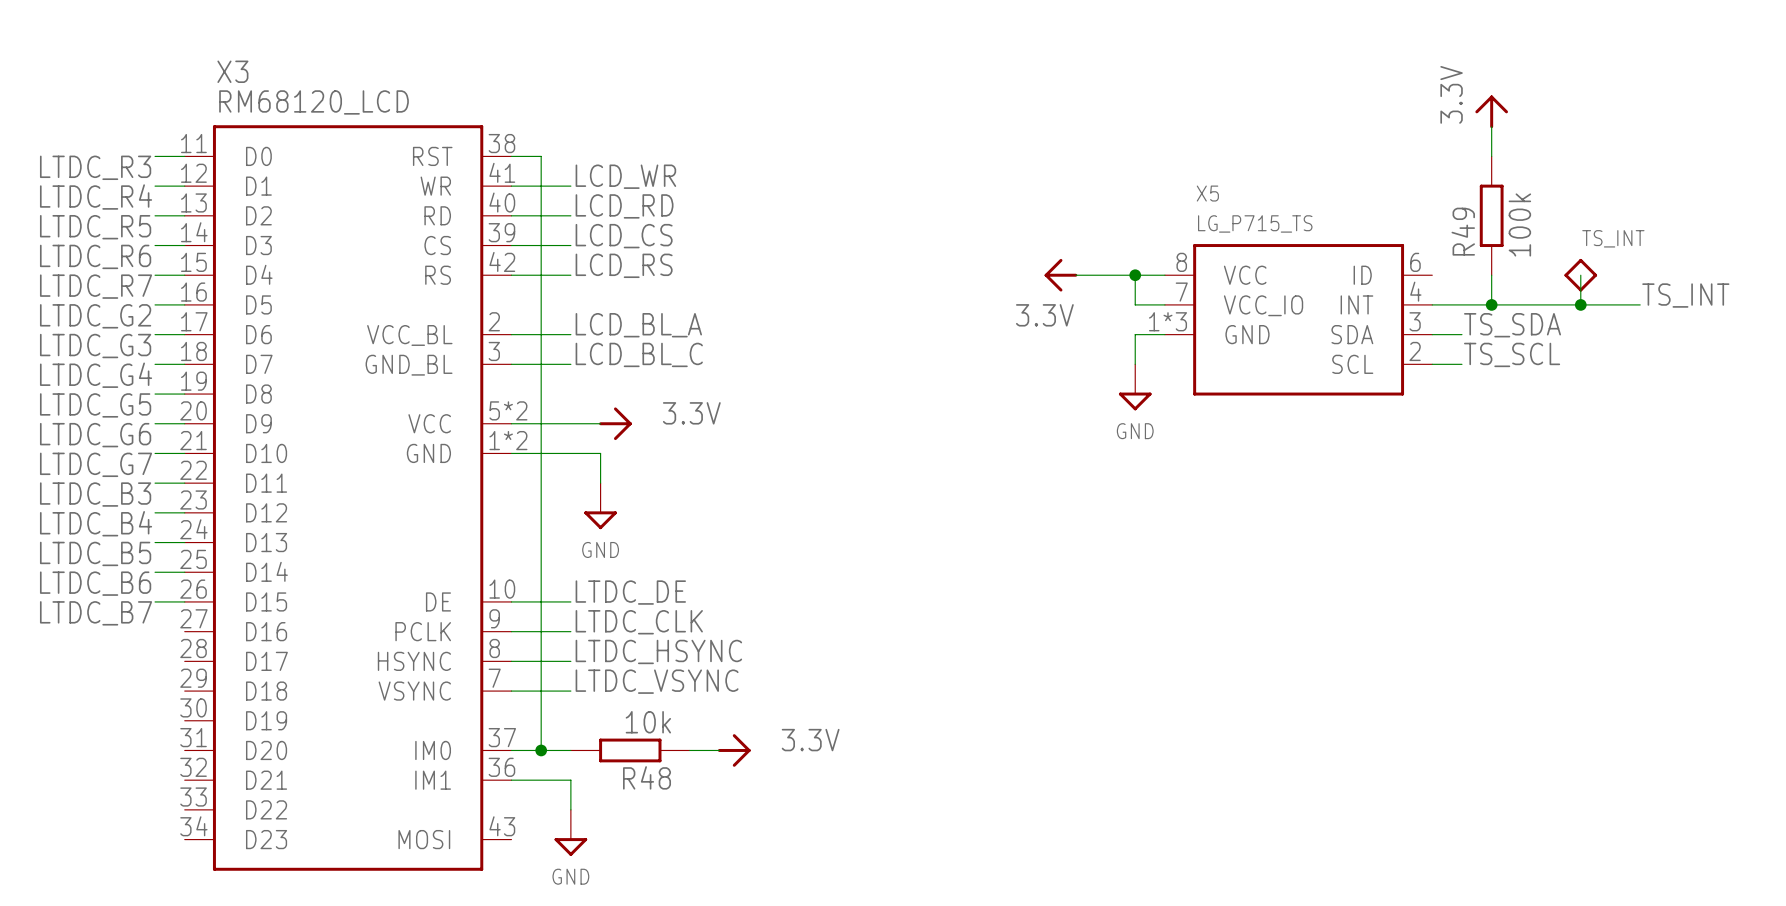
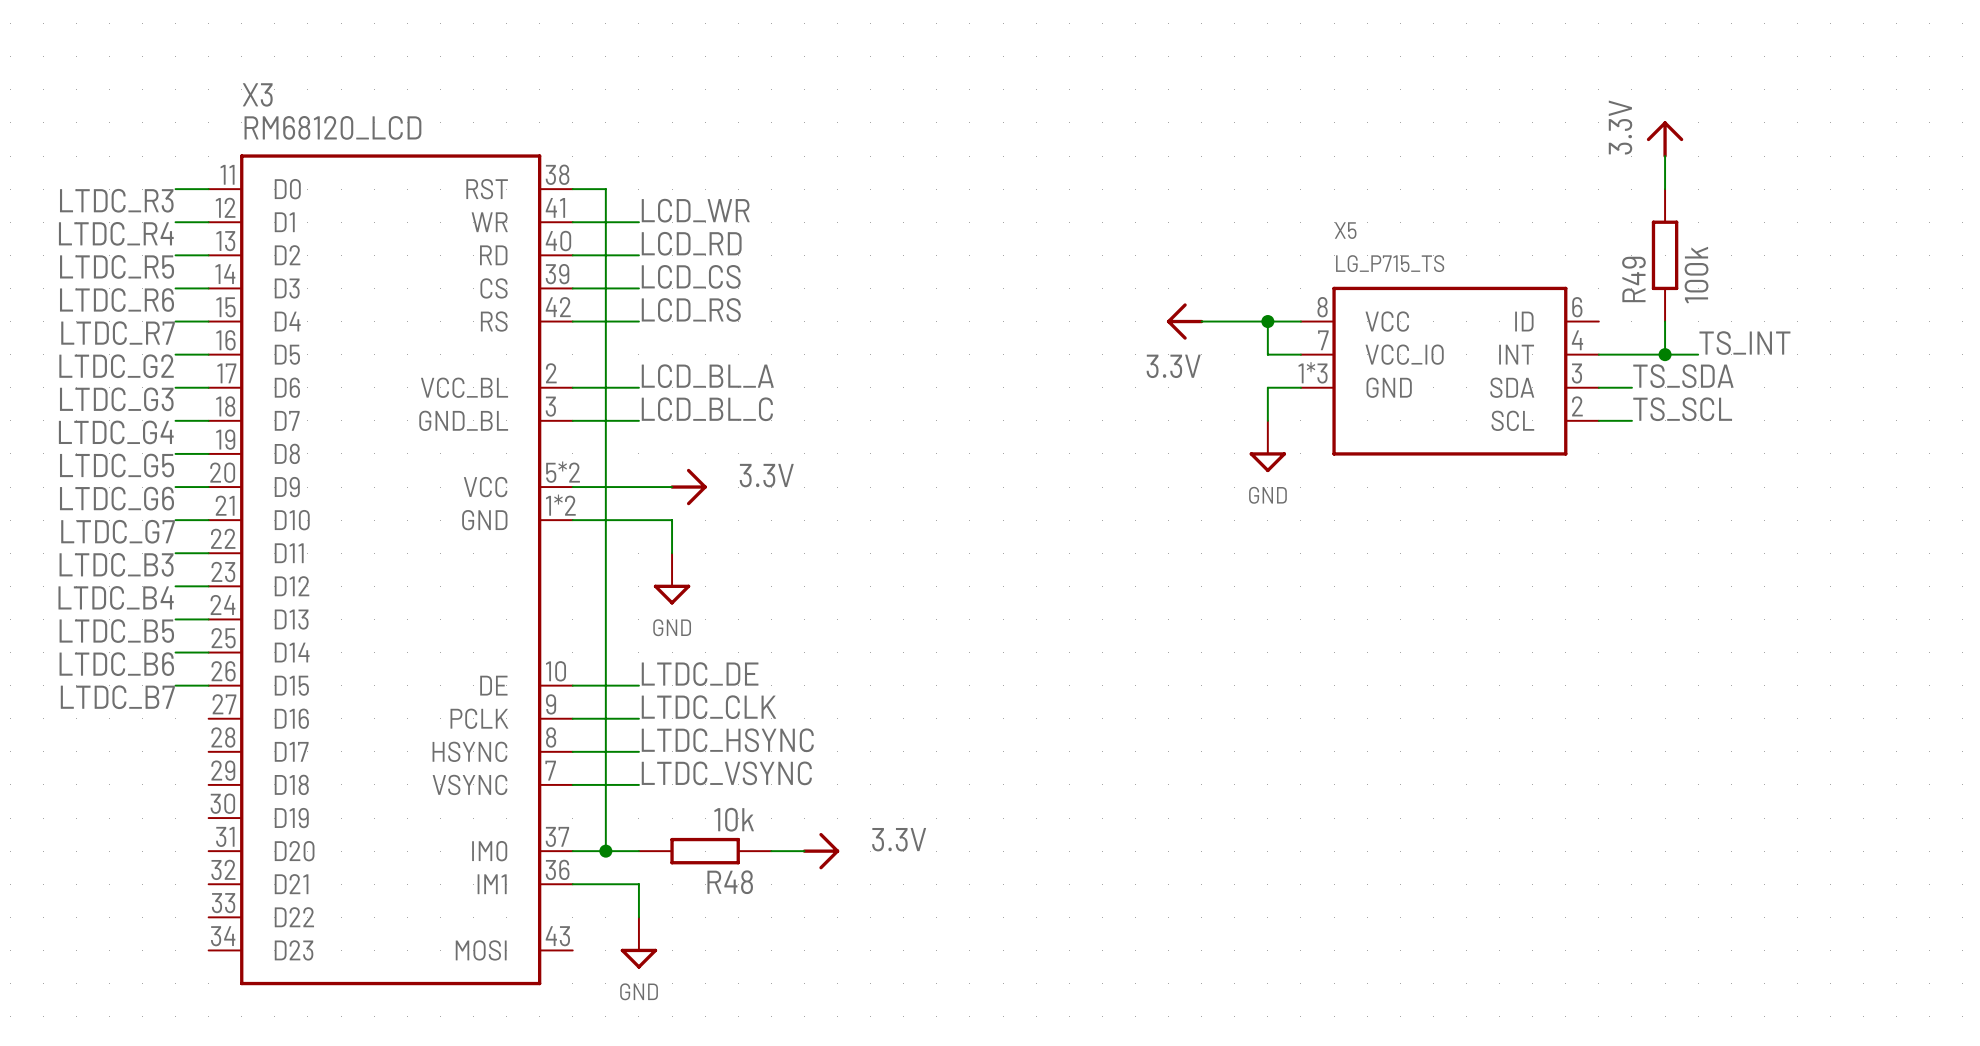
wire: (1580, 275) (1580, 304) -> none
part: TS_INT (1580, 275) -> none
label position: TS_INT (1685, 295) -> TS_INT (1744, 343)
wire: (1521, 304) (1640, 304) -> none
junction: (1580, 304) -> none

